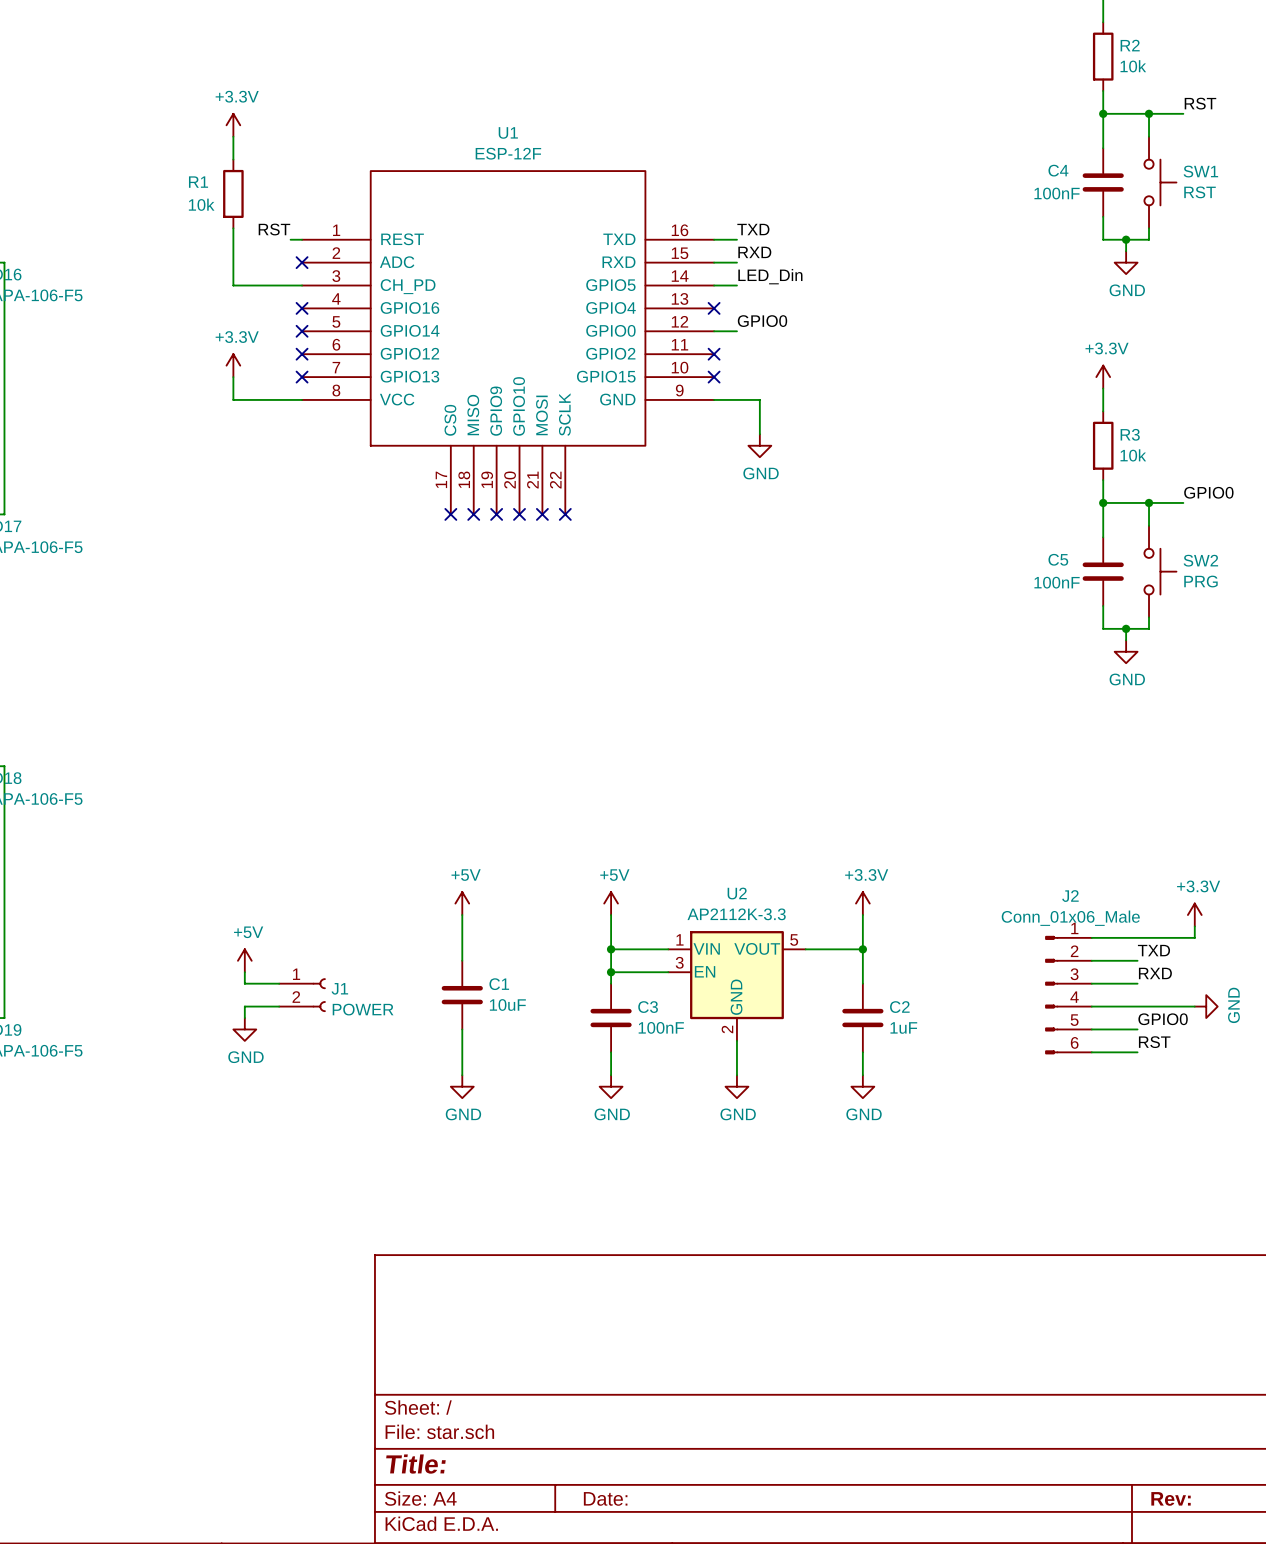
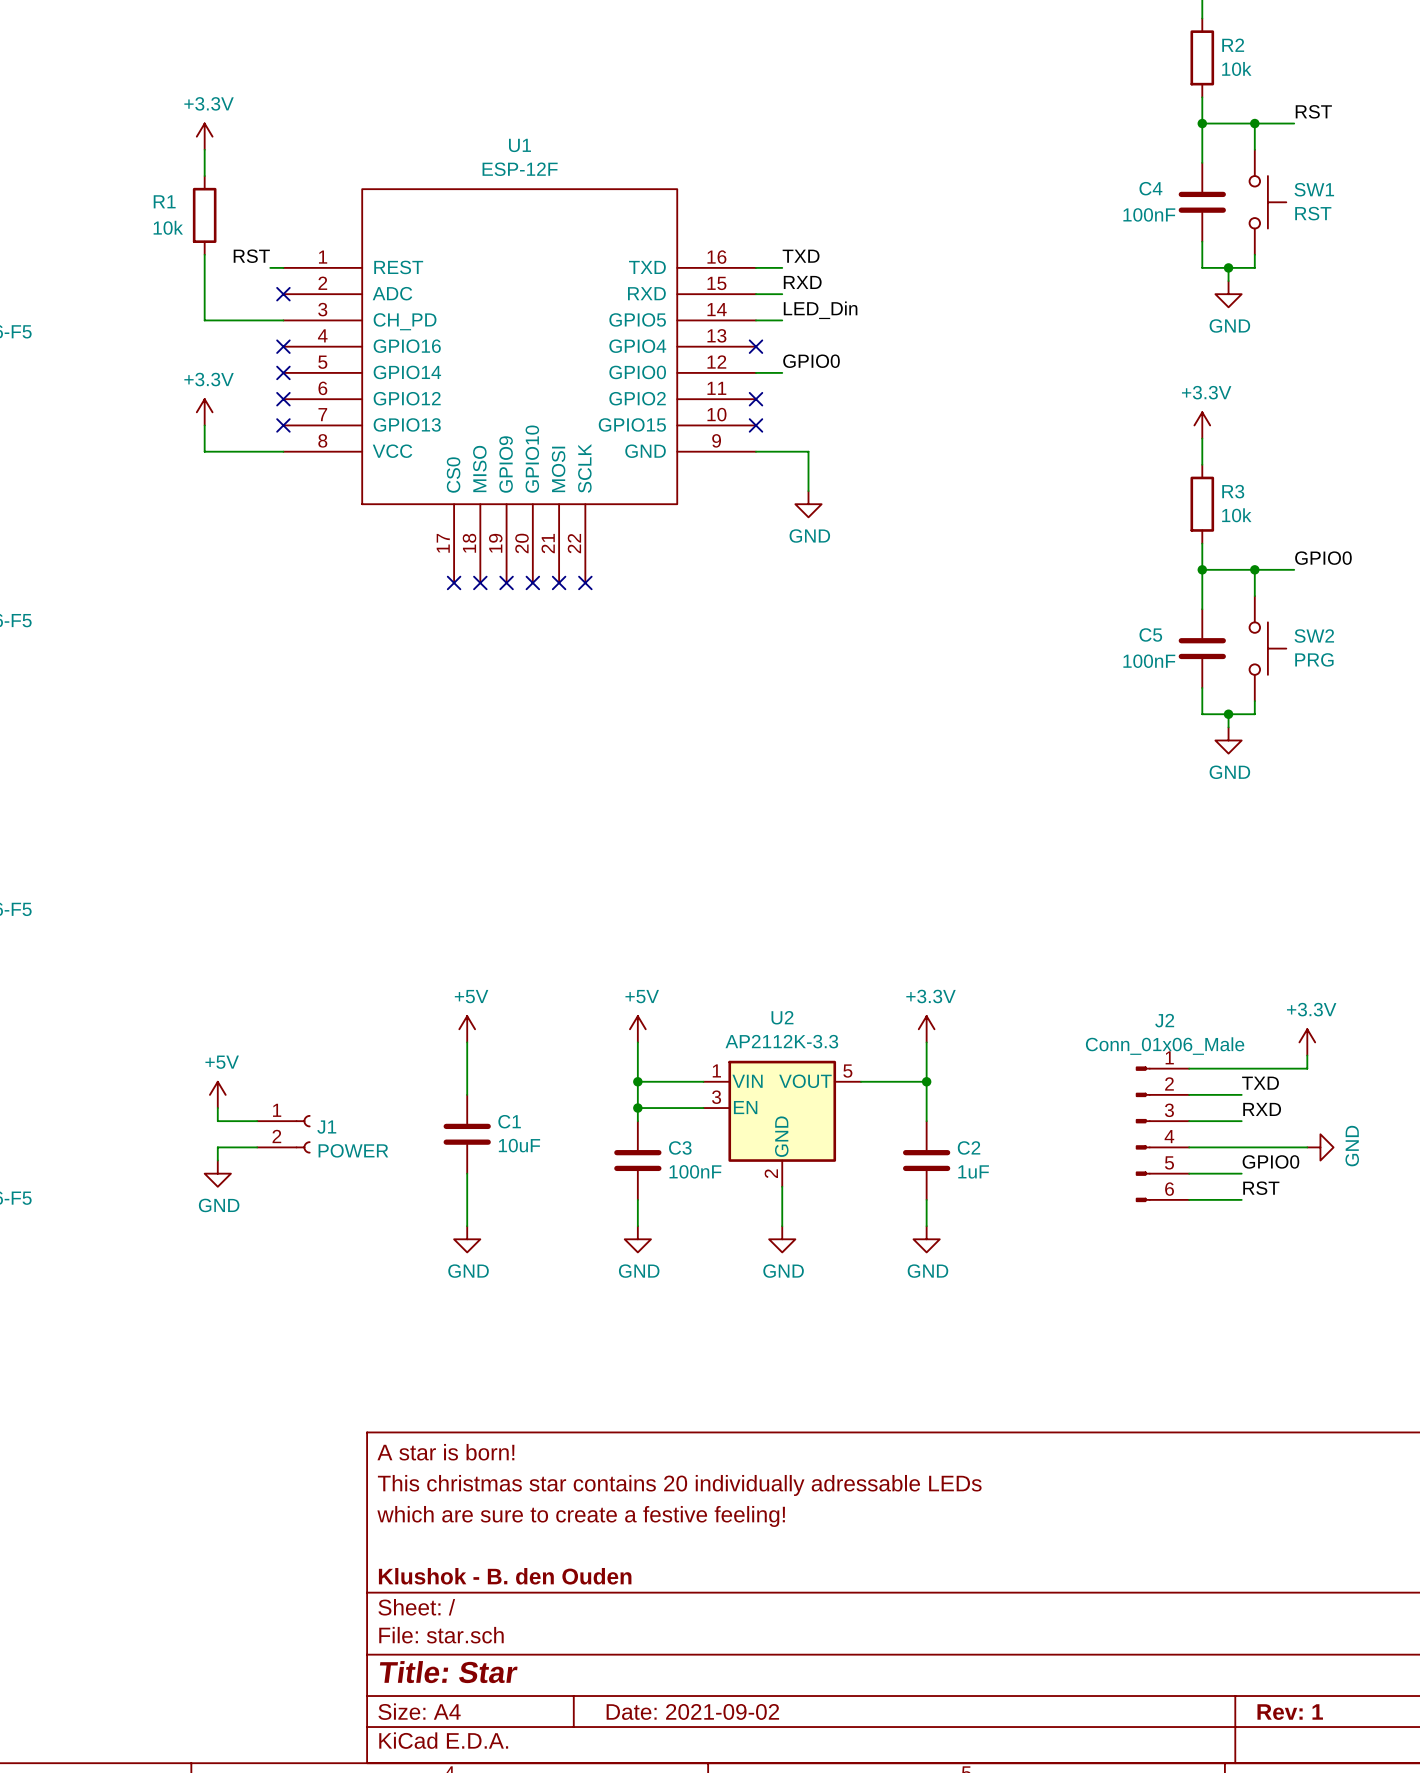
title block: none -> A star is born! (445, 1452)
title block: none -> This christmas star contains 20 individually adressable LEDs (679, 1485)
title block: none -> which are sure to create a festive feeling! (581, 1516)
title block: none -> Klushok - B. den Ouden (505, 1576)
title block: Title: (415, 1464) -> Title: Star (448, 1672)
title block: Date: (605, 1498) -> Date: 2021-09-02 (692, 1711)
title block: Rev: (1171, 1498) -> Rev: 1 (1290, 1712)

